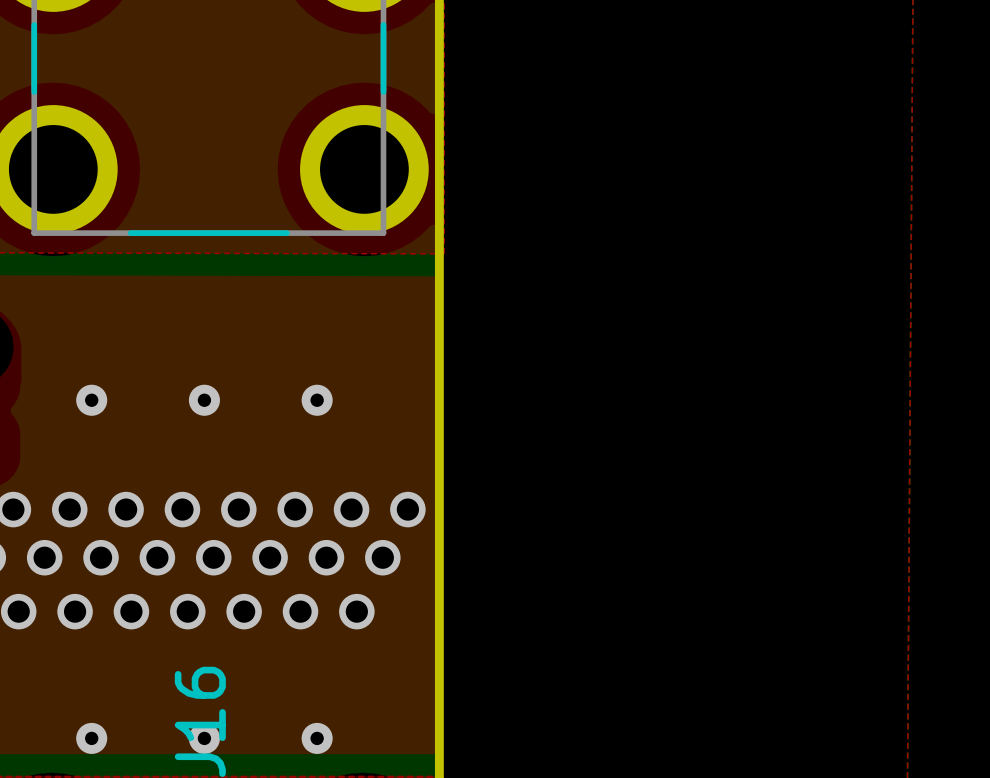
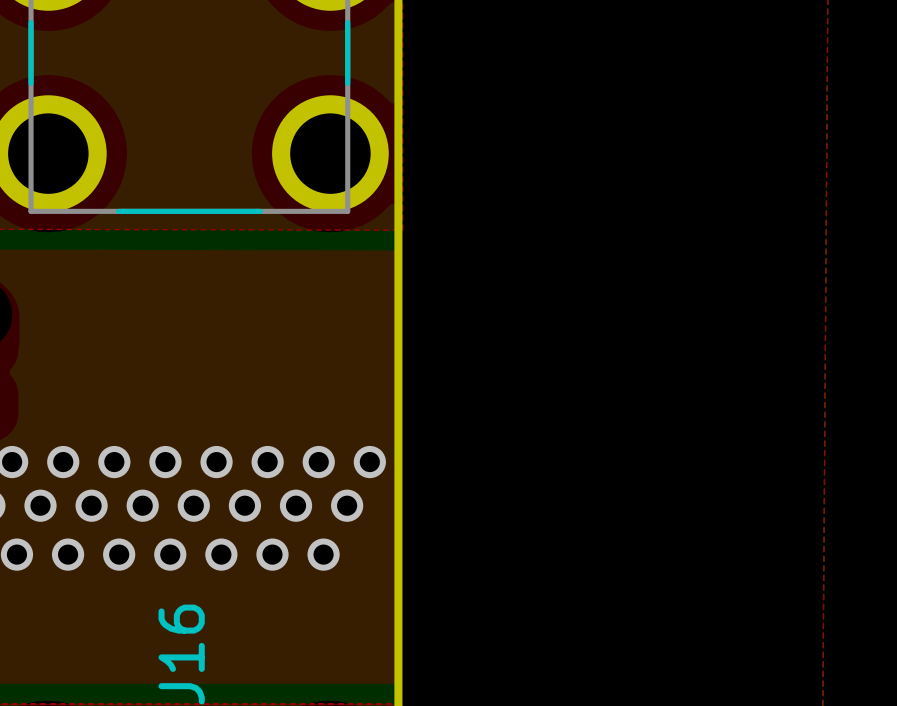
via: (91, 400) -> none
via: (204, 400) -> none
via: (317, 400) -> none
via: (91, 738) -> none
via: (204, 738) -> none
via: (317, 738) -> none

